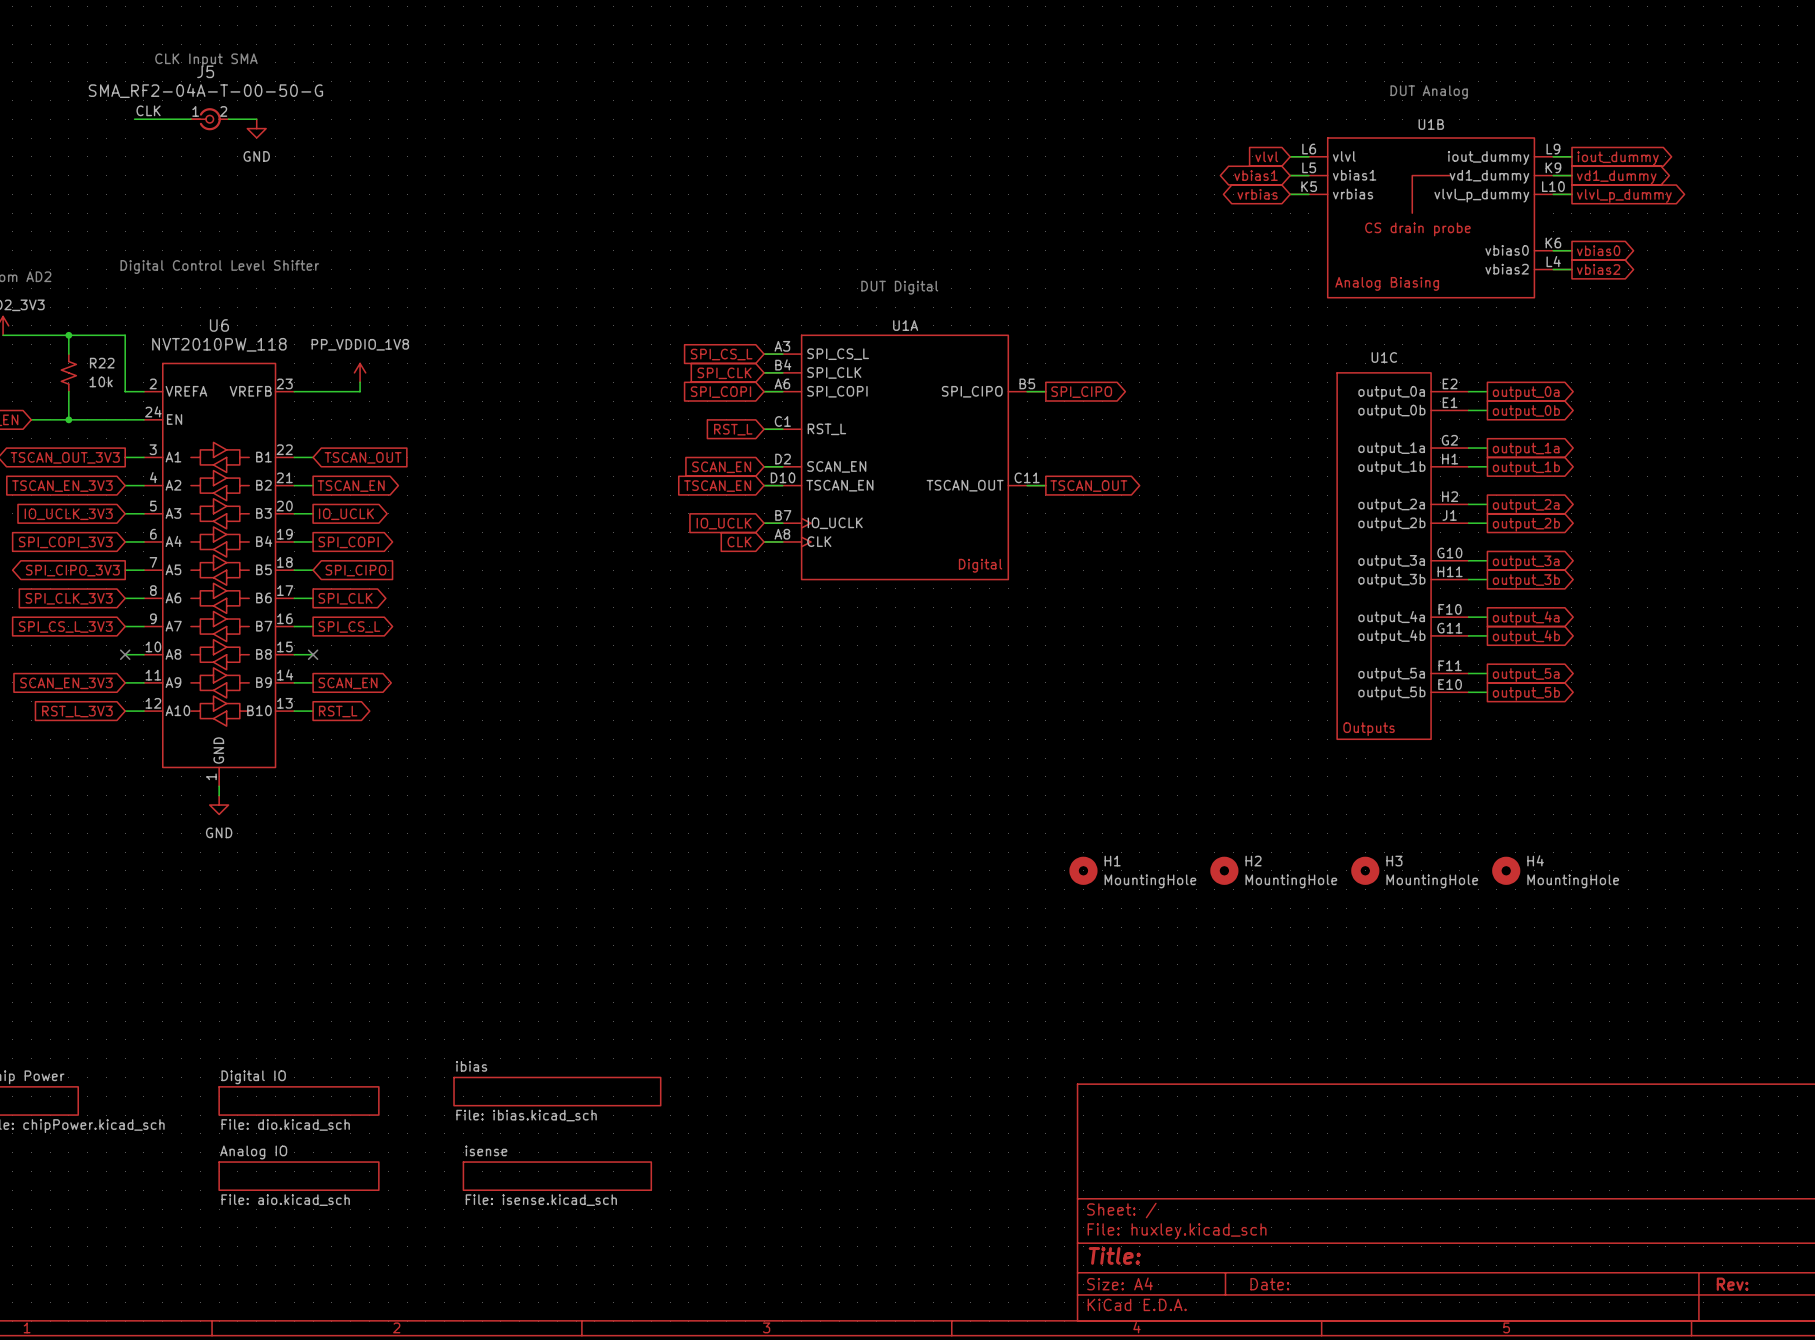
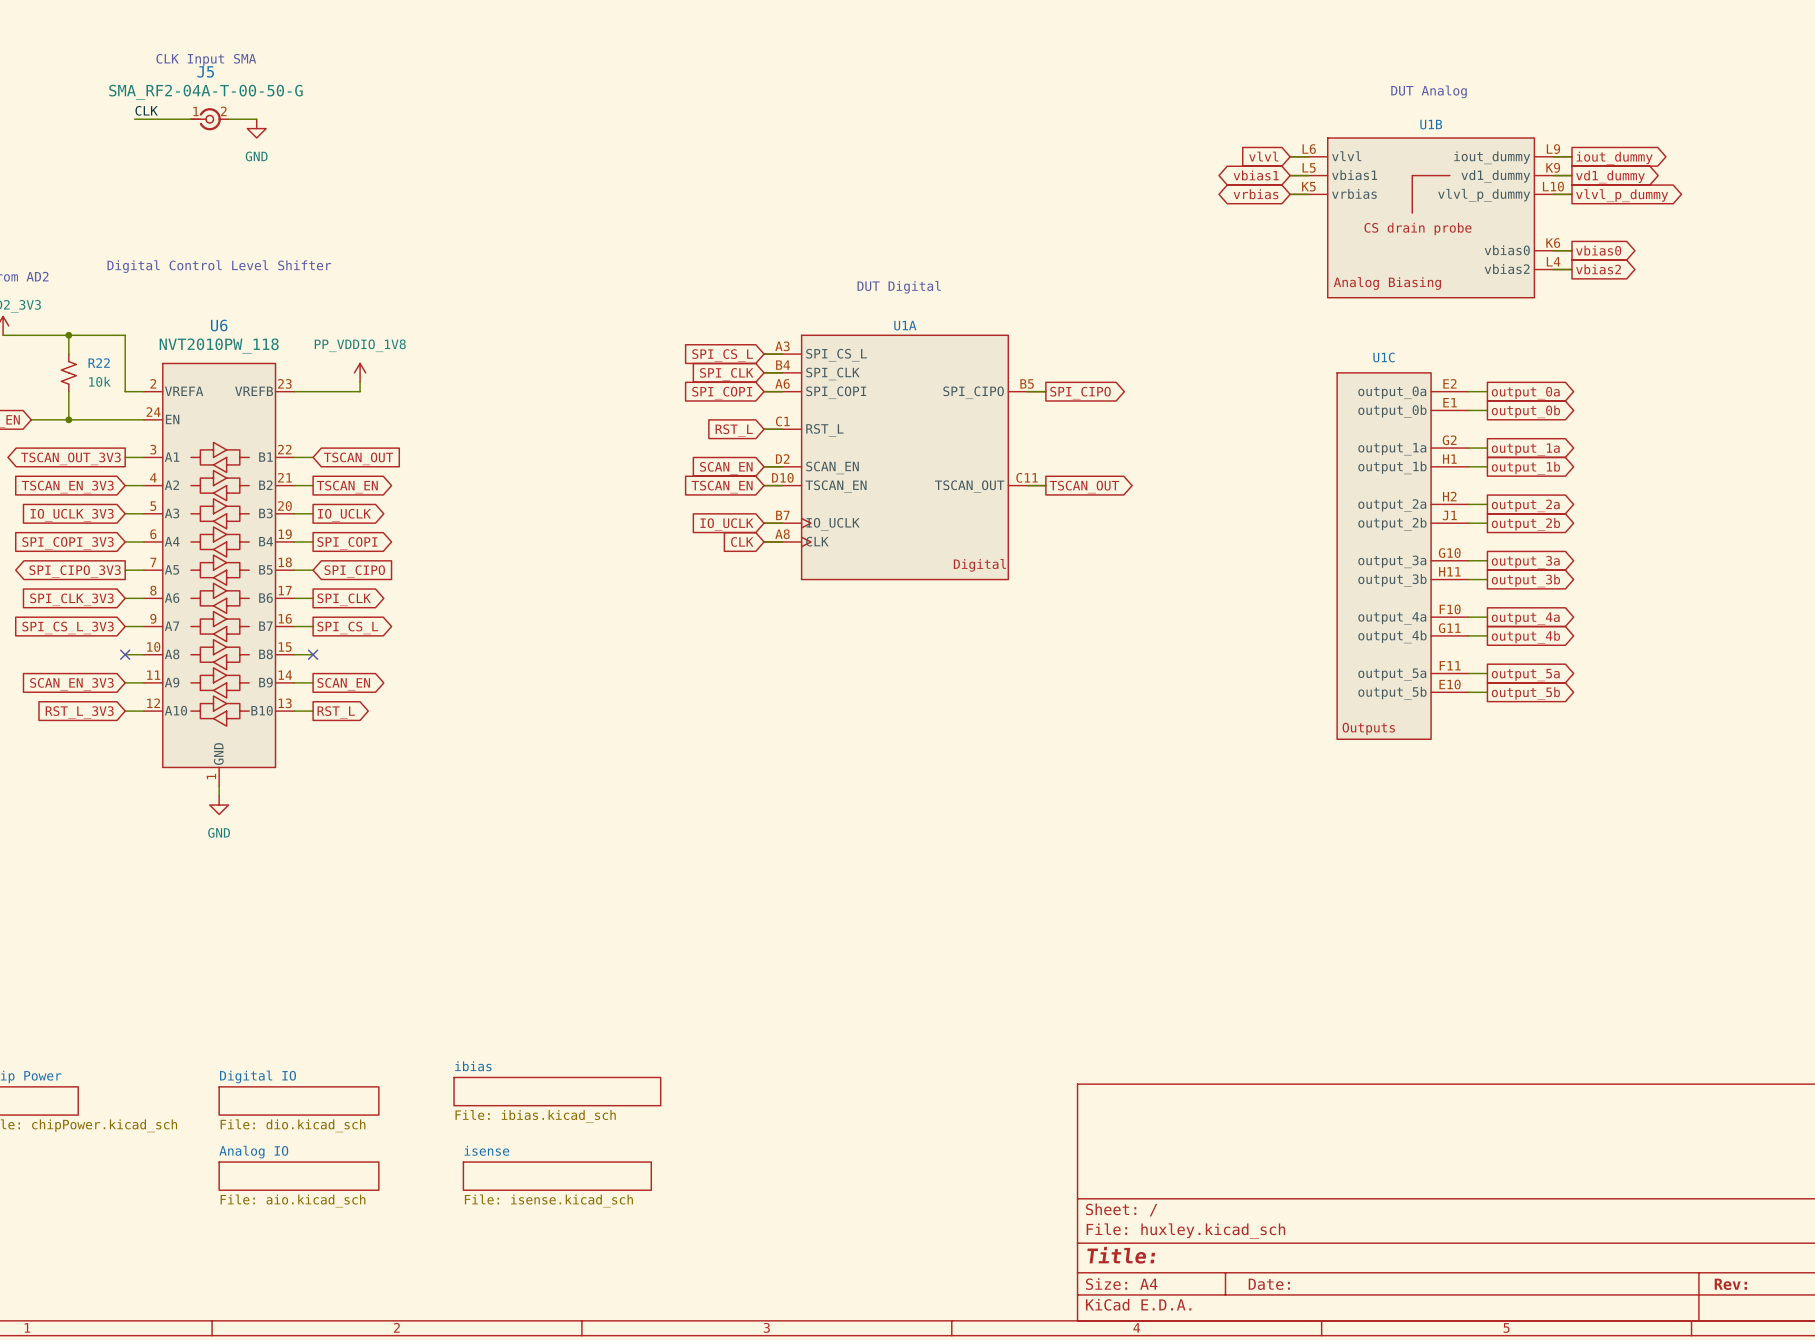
H1: MountingHole (1083, 870) -> none
H2: MountingHole (1224, 870) -> none
H3: MountingHole (1365, 870) -> none
H4: MountingHole (1506, 870) -> none

